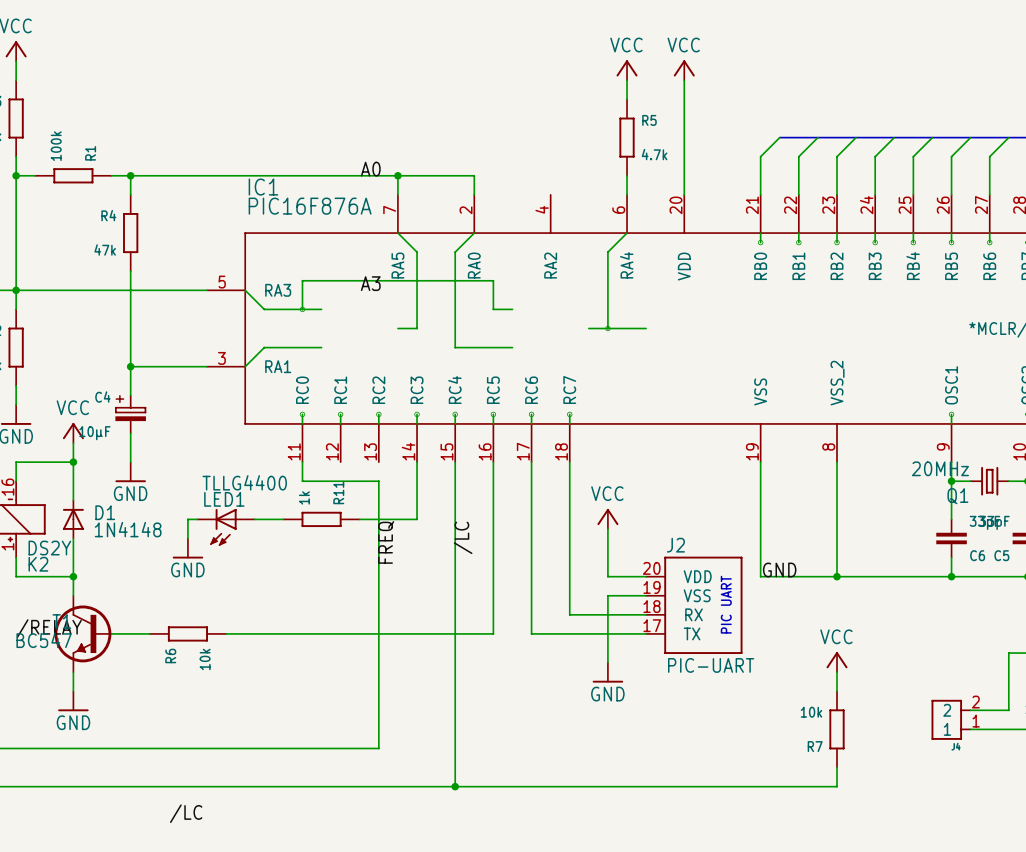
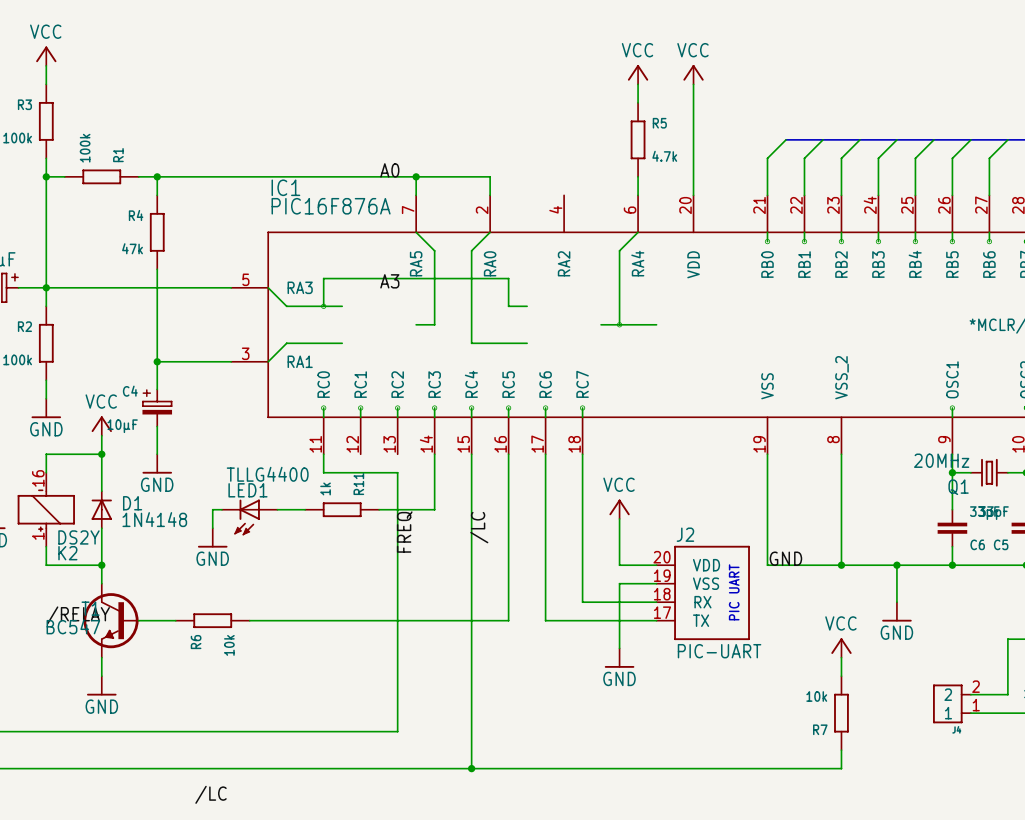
wire: none -> (896, 565) (896, 602)
junction: none -> (896, 565)
power symbol: none -> GND (896, 611)

